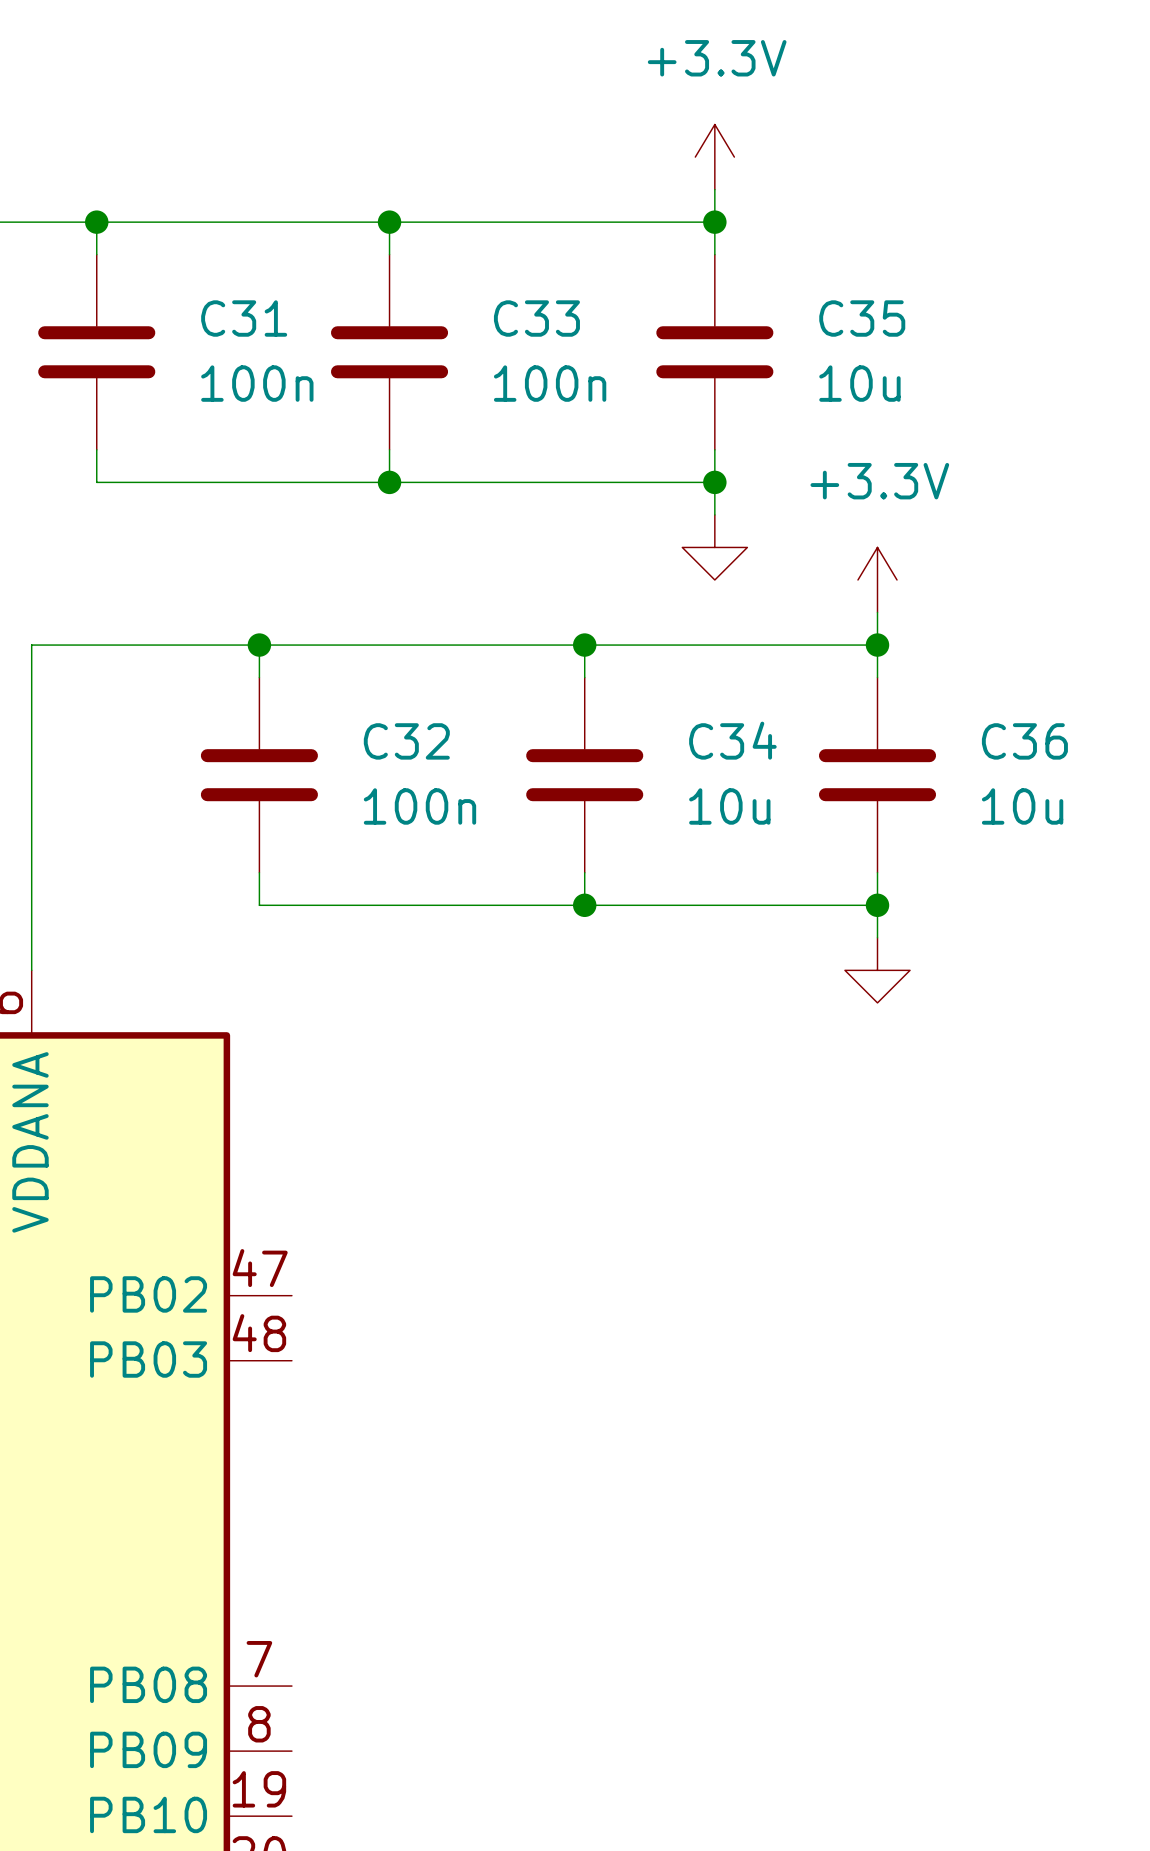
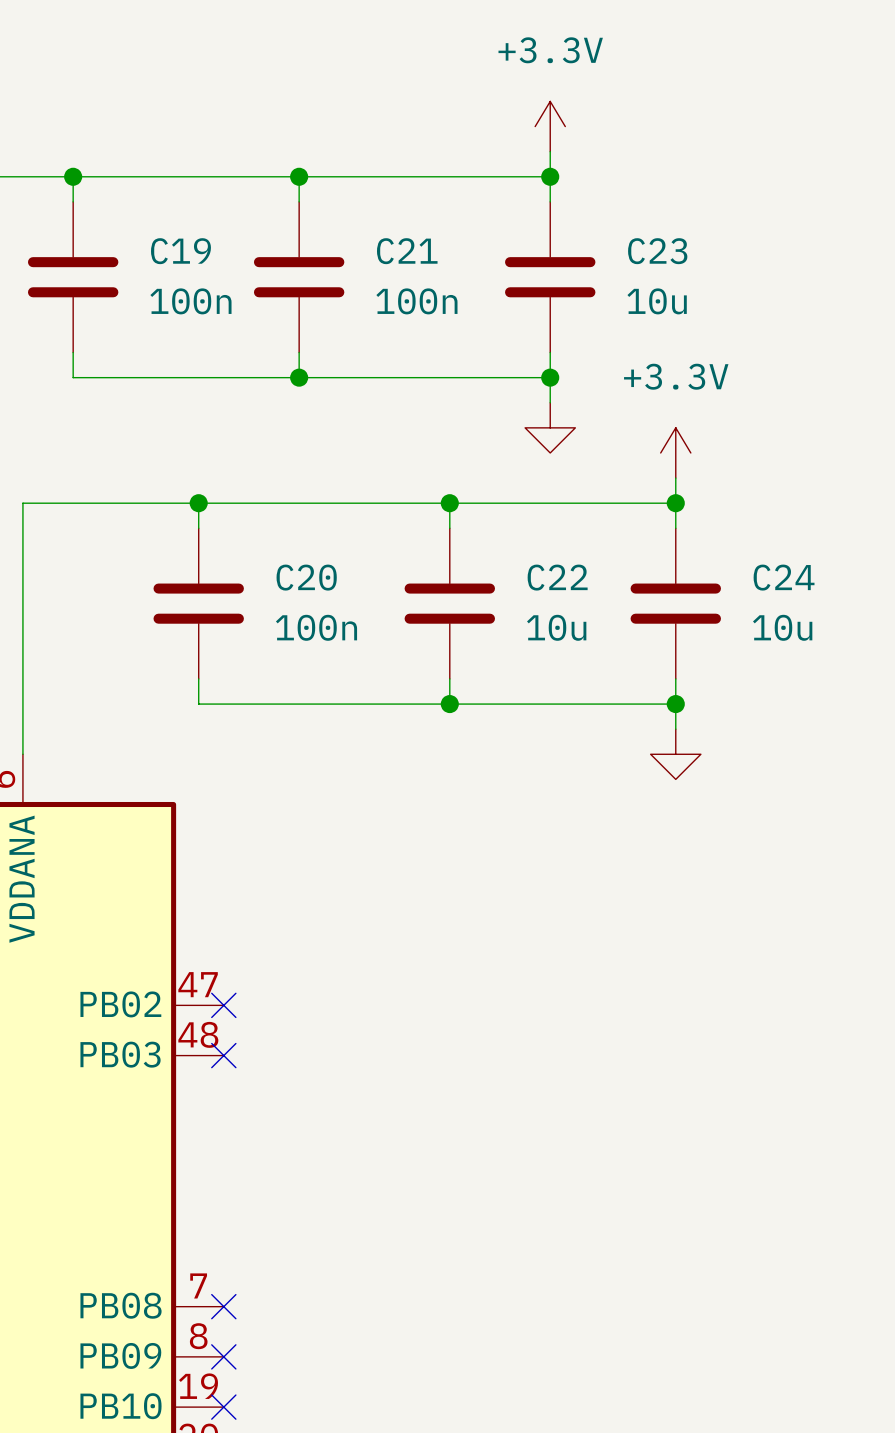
C31 name: C31 (244, 318) -> C19 (180, 251)
C33 name: C33 (536, 318) -> C21 (407, 251)
C35 name: C35 (862, 318) -> C23 (657, 251)
C34 name: C34 (732, 740) -> C22 (557, 577)
C32 name: C32 (406, 741) -> C20 (306, 577)
C36 name: C36 (1024, 741) -> C24 (784, 577)
no-connect mark: none -> (223, 1005)
no-connect mark: none -> (223, 1055)
no-connect mark: none -> (223, 1306)
no-connect mark: none -> (223, 1356)
no-connect mark: none -> (223, 1407)

